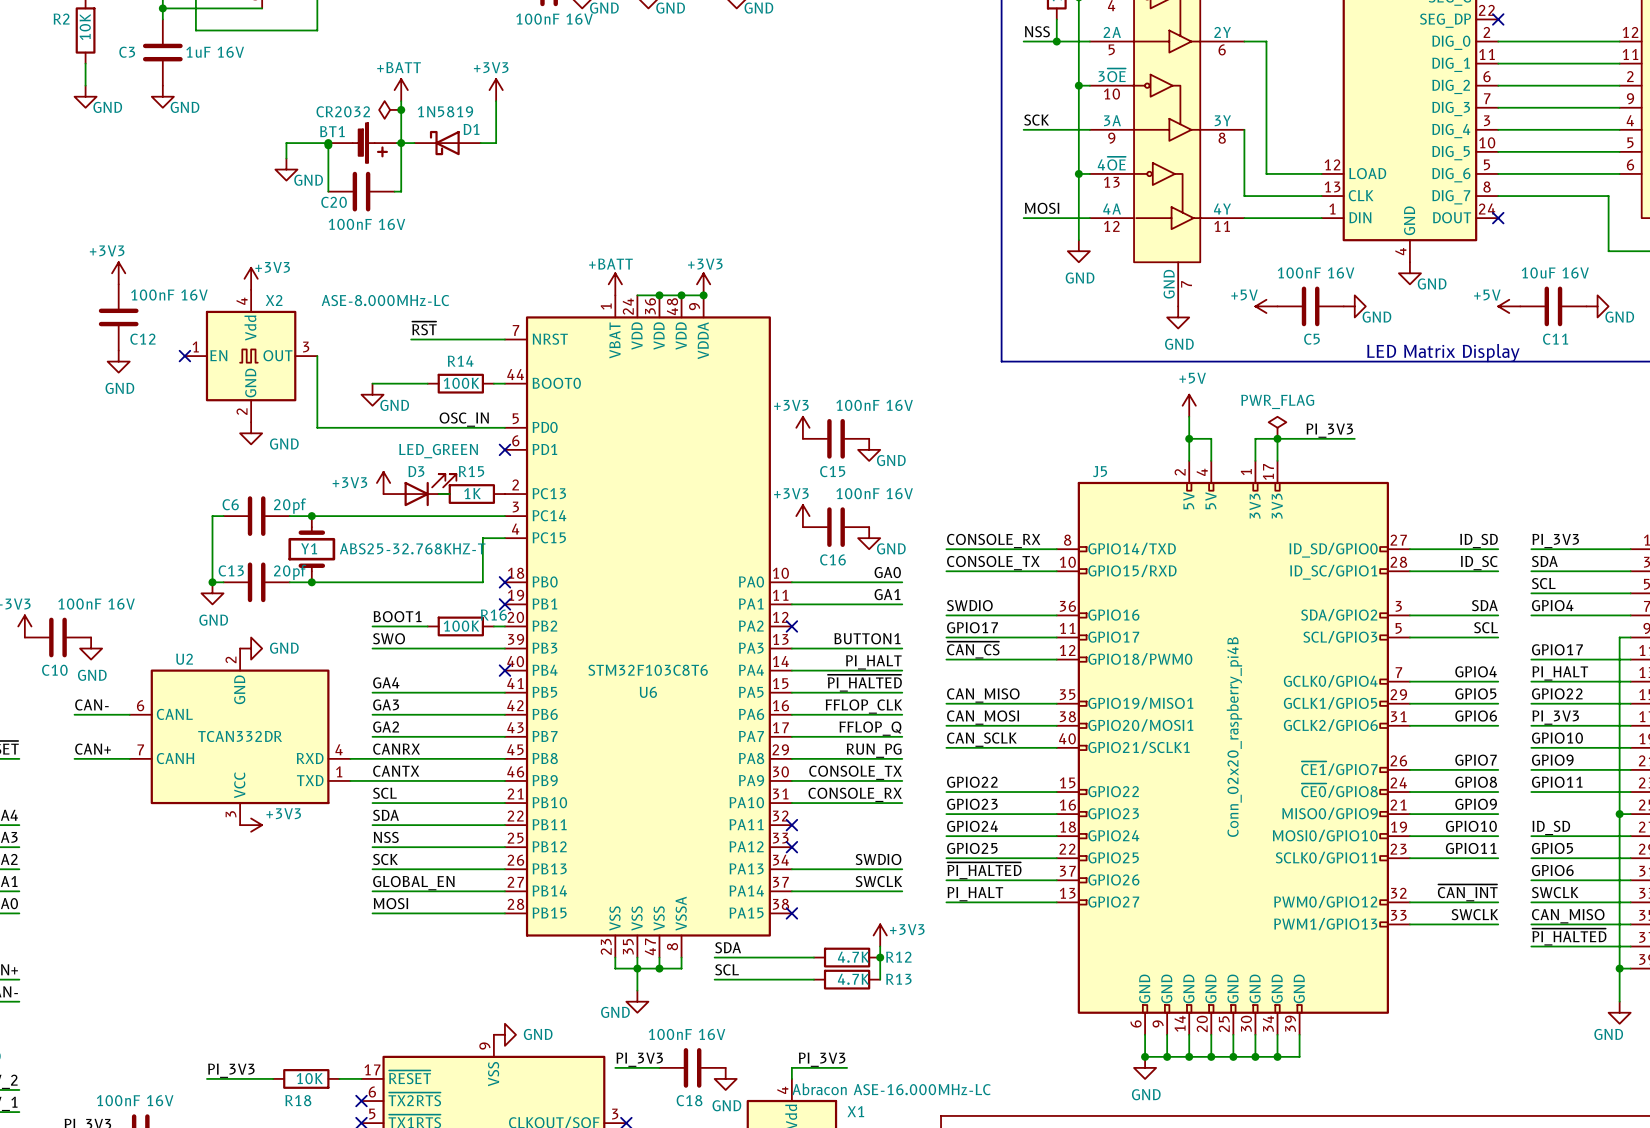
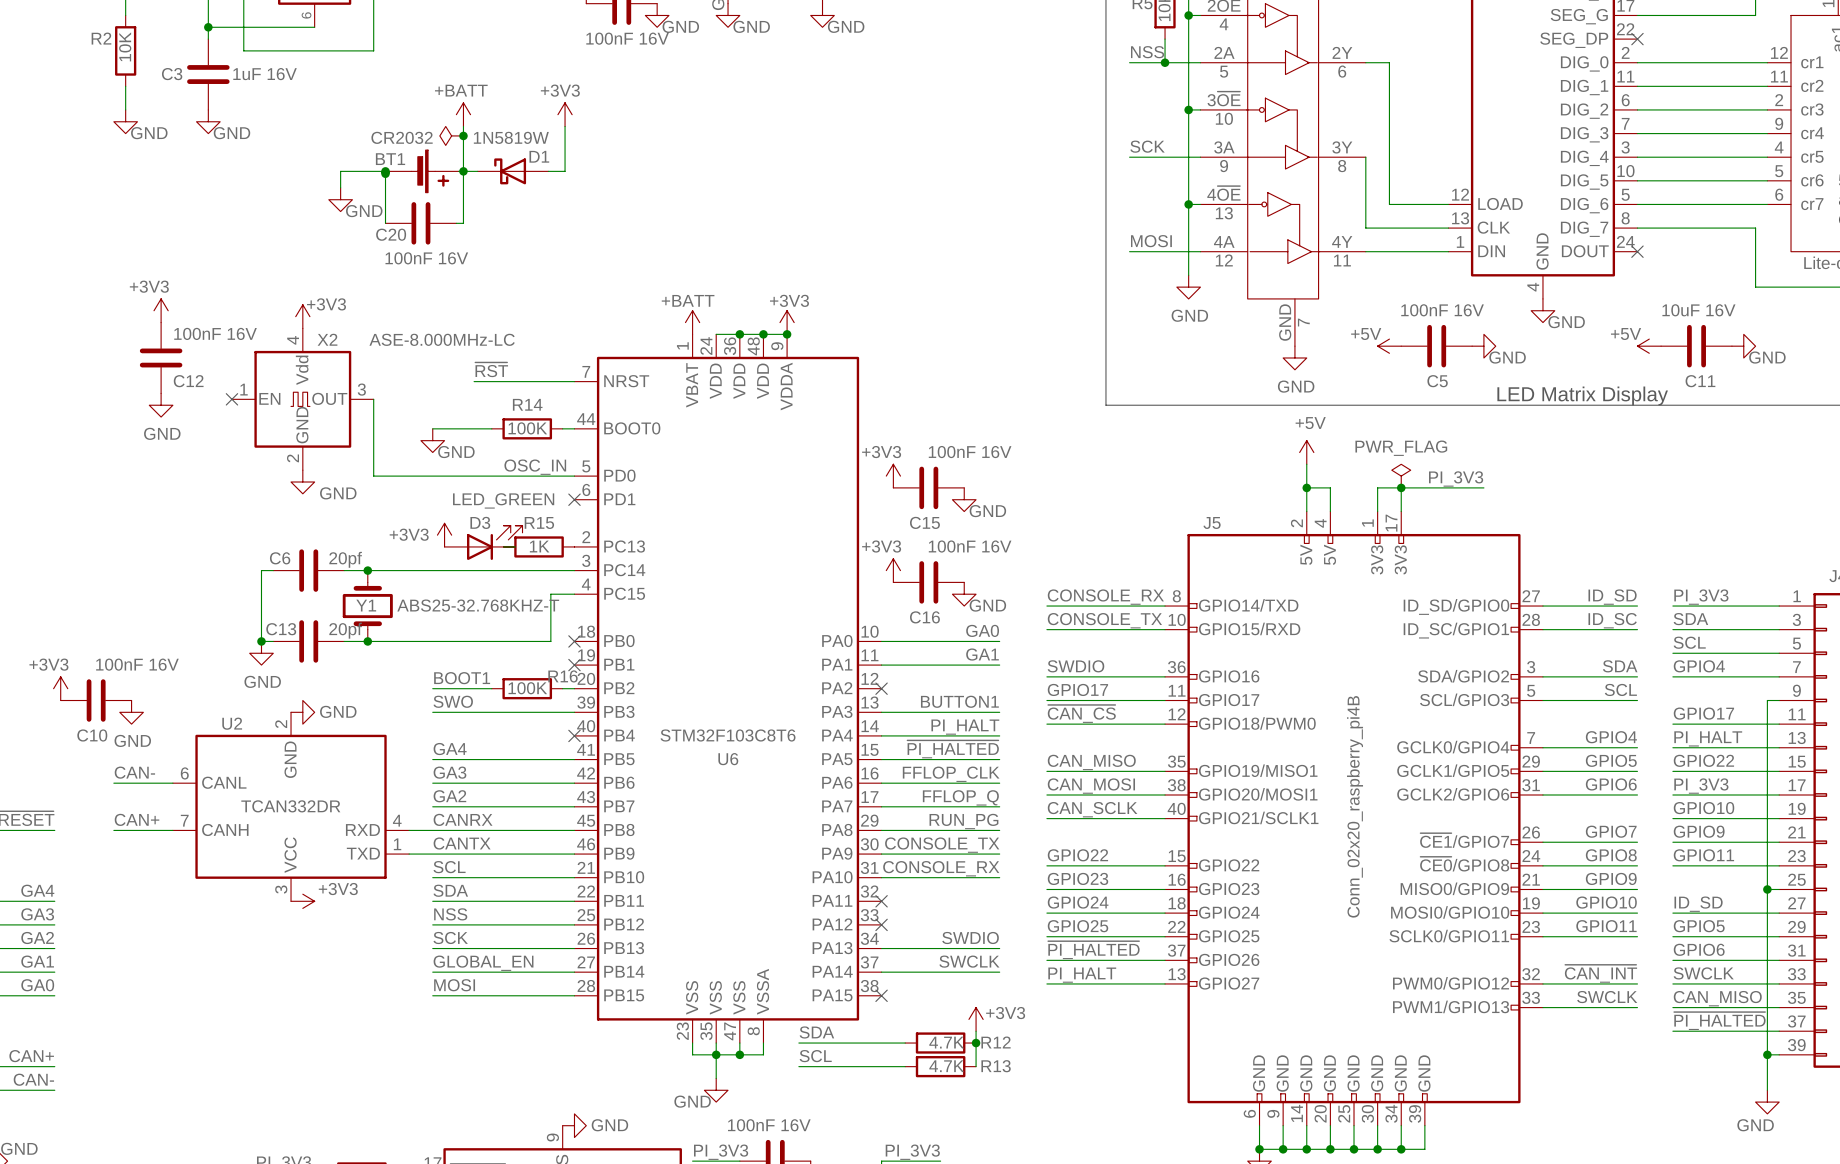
D1 value: 1N5819 (445, 111) -> 1N5819W (511, 137)

